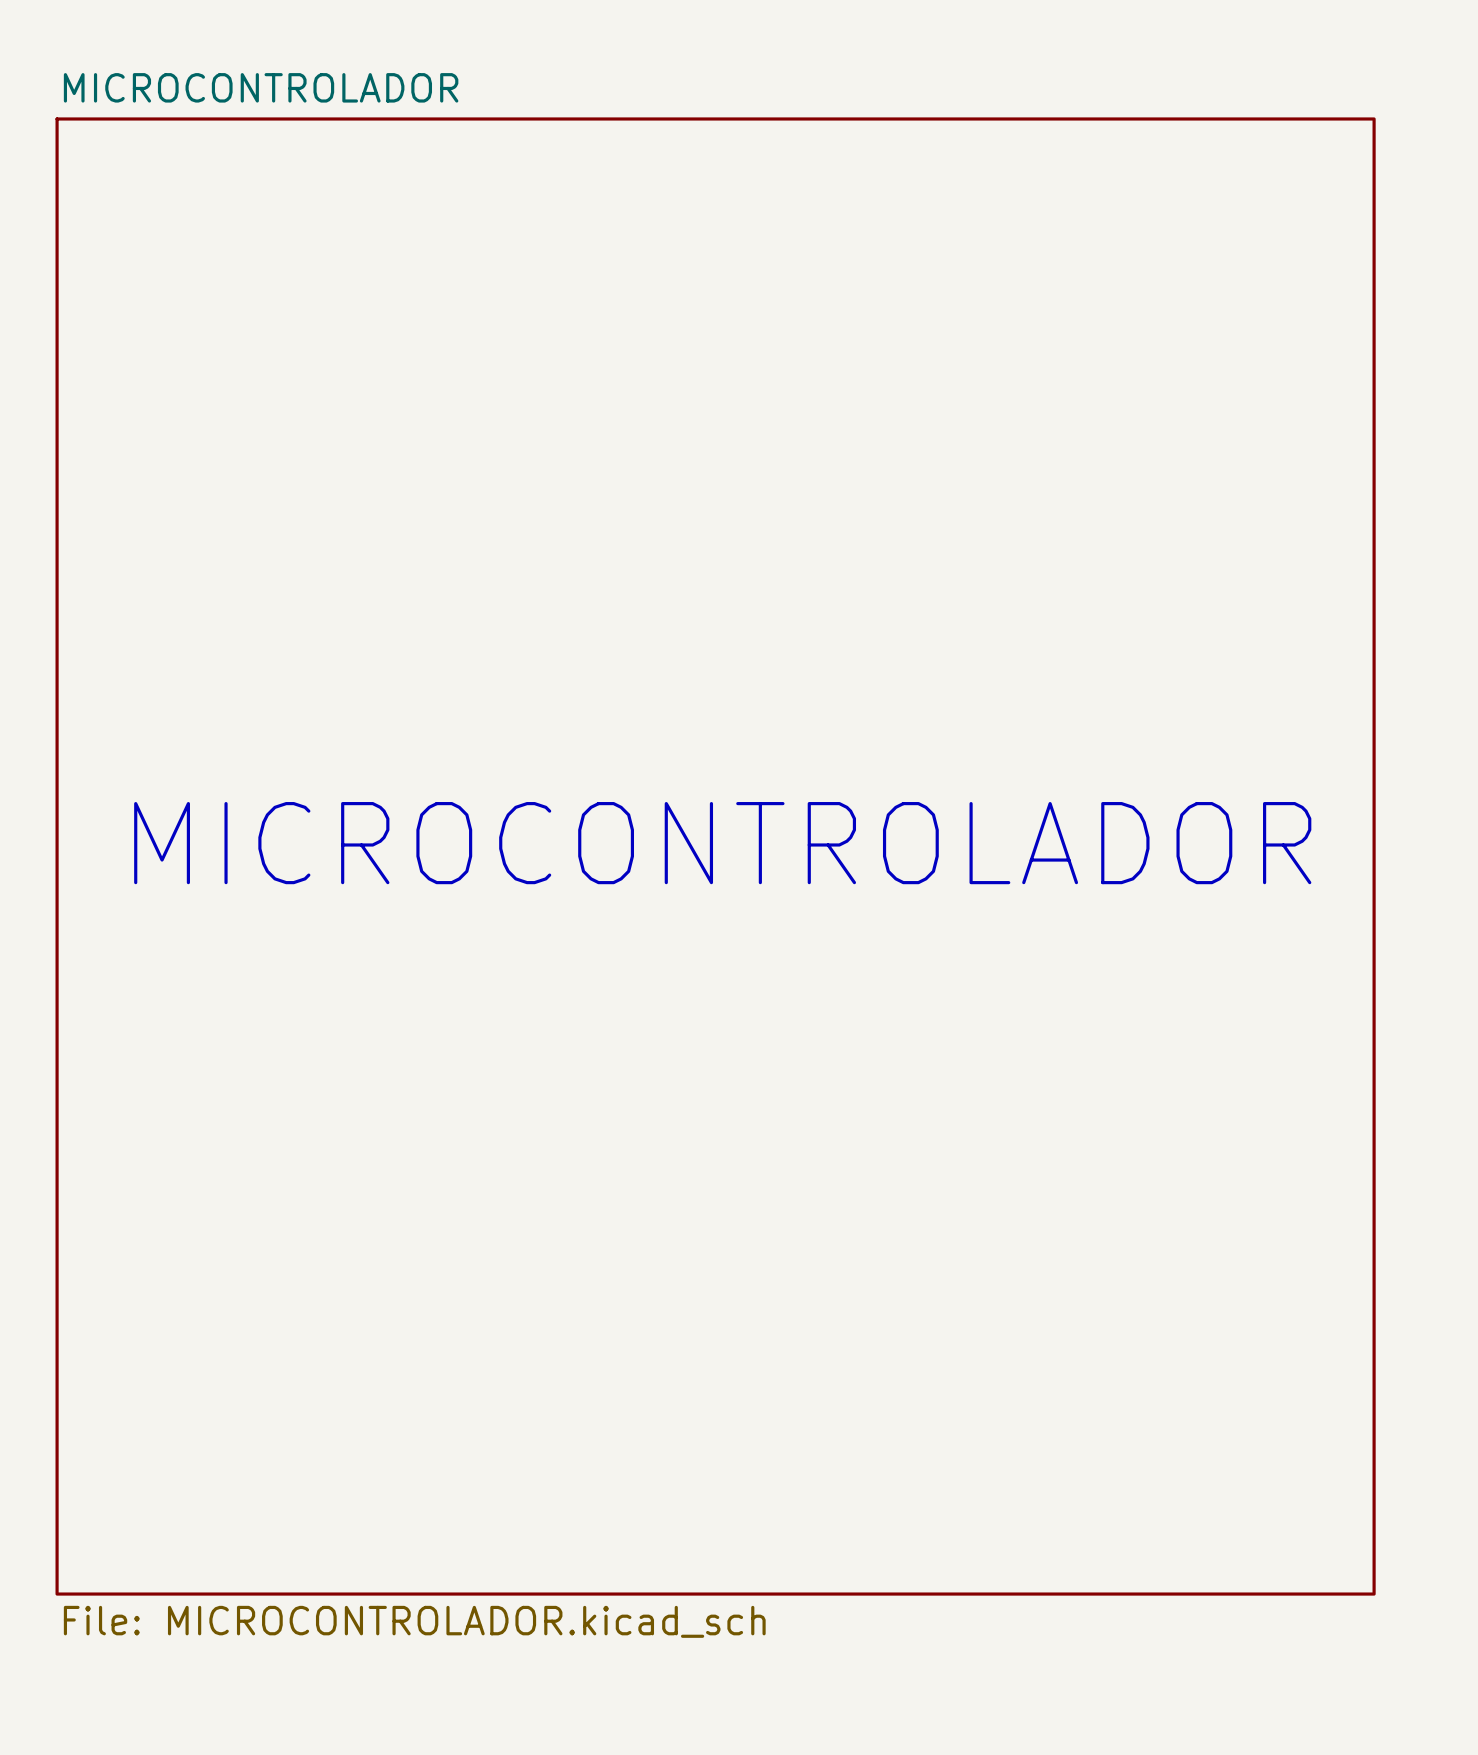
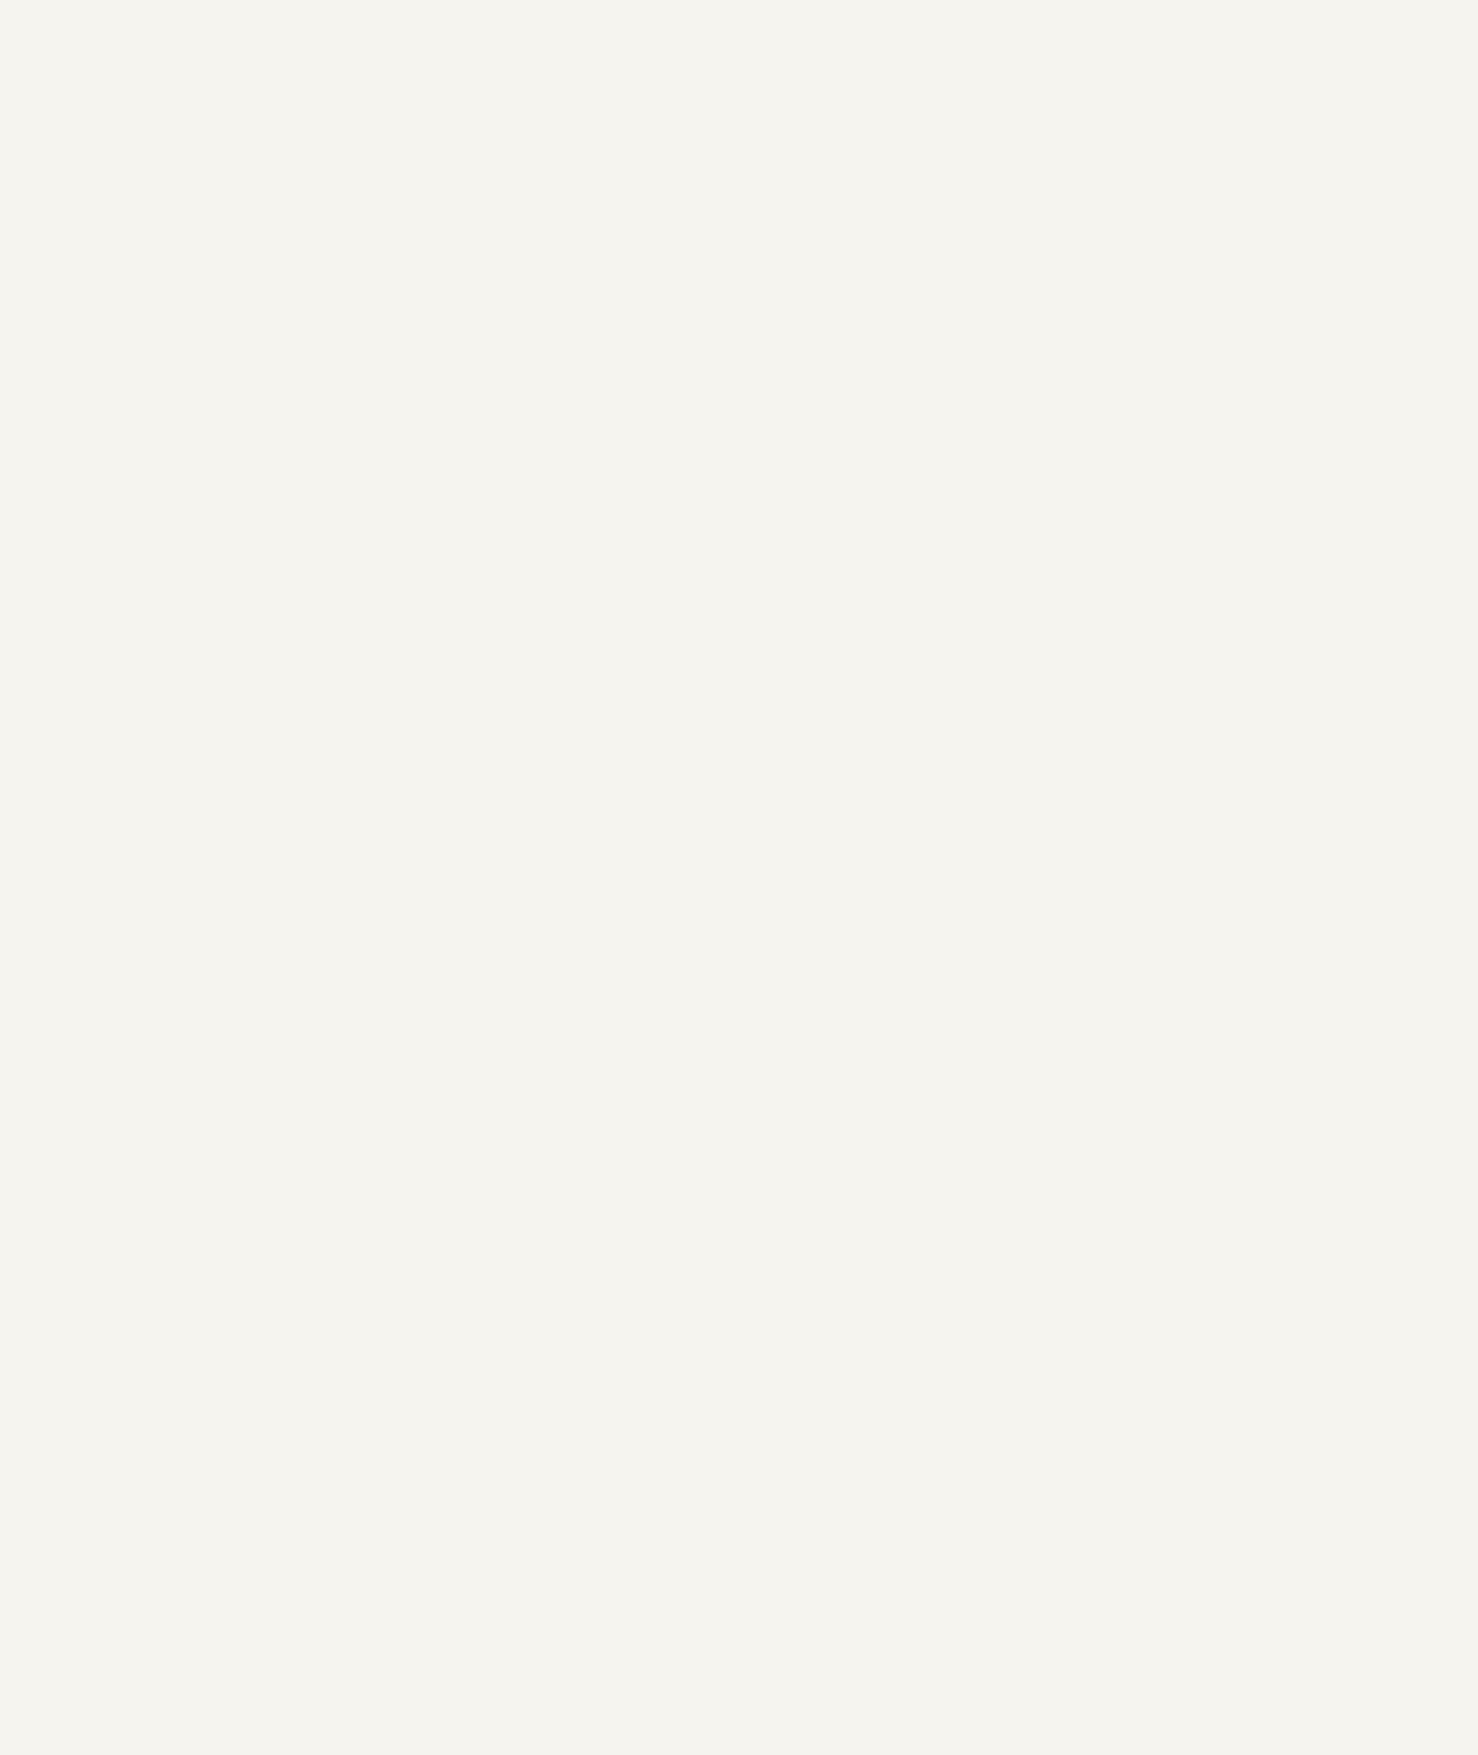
text: MICROCONTROLADOR (722, 843) -> none
sheet MICROCONTROLADOR: File: MICROCONTROLADOR.kicad_sch (715, 856) -> none

